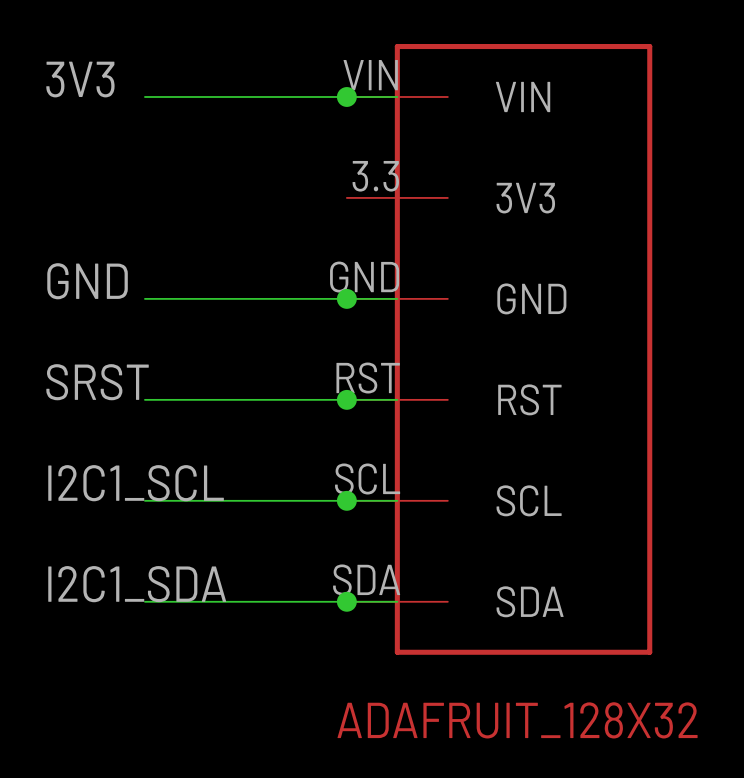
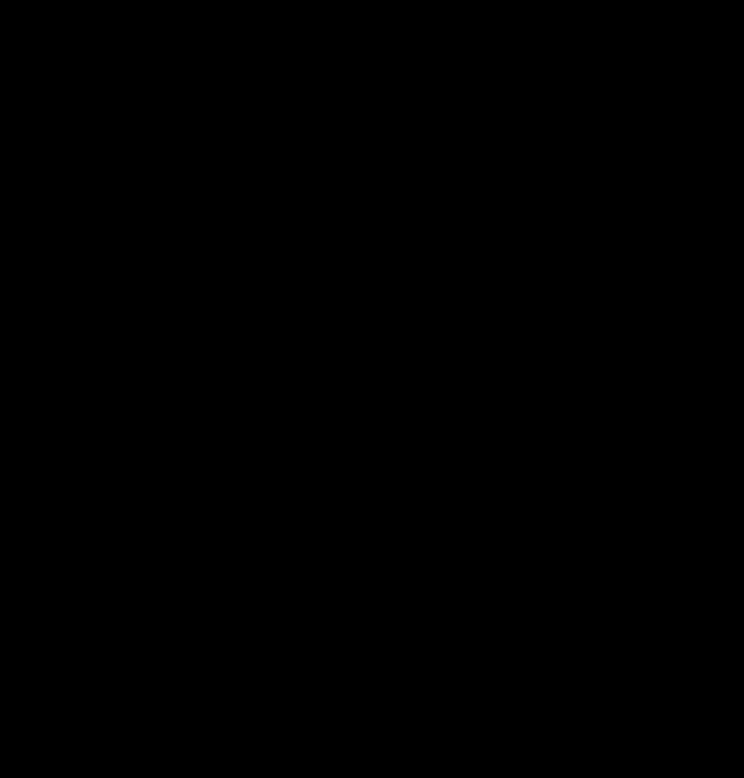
label: 3V3 (80, 79) -> none
wire: (144, 96) (397, 96) -> none
junction: (346, 96) -> none
label: GND (87, 281) -> none
wire: (144, 298) (397, 298) -> none
junction: (346, 298) -> none
part: (499, 349) -> none
label: SRST (97, 382) -> none
wire: (144, 399) (397, 399) -> none
junction: (346, 399) -> none
label: I2C1_SCL (136, 483) -> none
wire: (144, 500) (397, 500) -> none
junction: (346, 500) -> none
label: I2C1_SDA (137, 584) -> none
wire: (144, 601) (397, 601) -> none
junction: (346, 601) -> none

